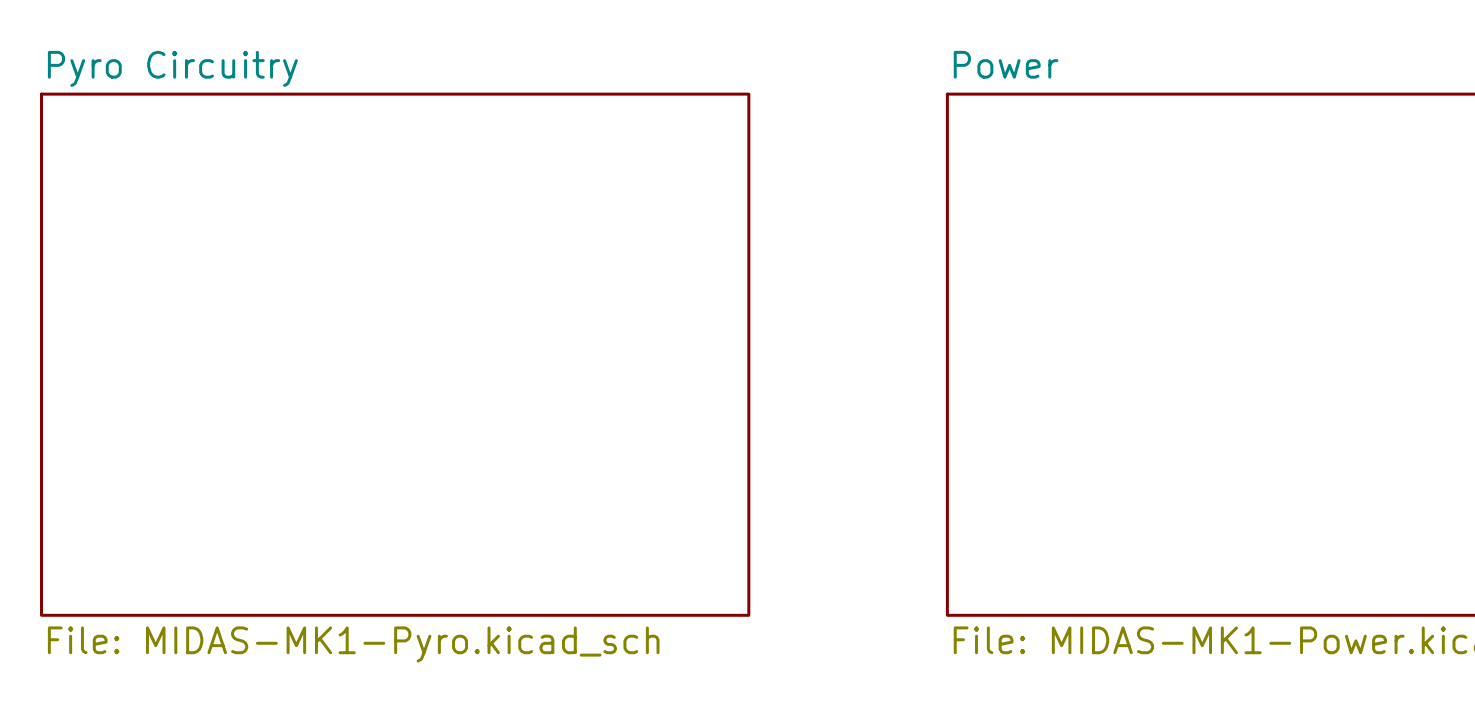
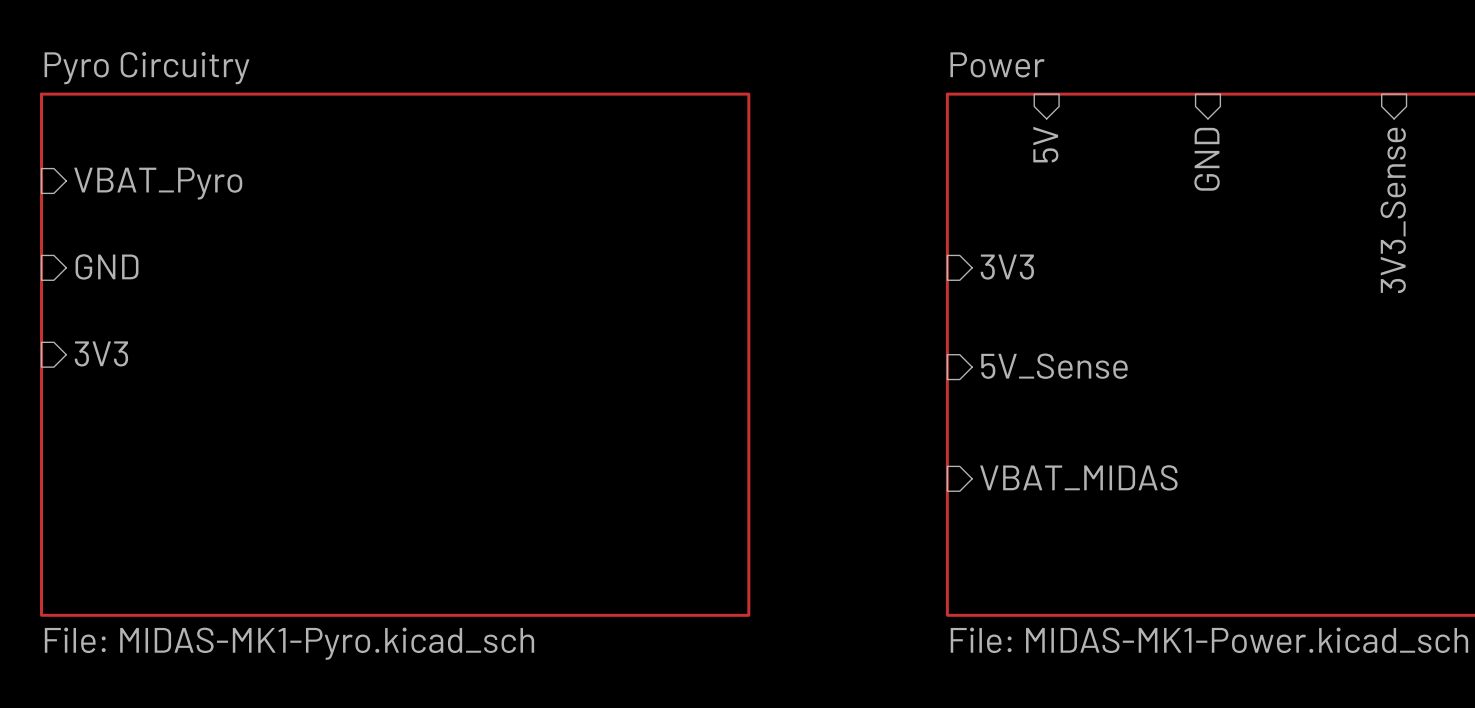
sheet pin: none -> 5V (1045, 144)
sheet pin: none -> GND (1207, 159)
sheet pin: none -> VBAT_Pyro (158, 183)
sheet pin: none -> 3V3_Sense (1393, 210)
sheet pin: none -> GND (107, 266)
sheet pin: none -> 3V3 (1007, 267)
sheet pin: none -> 3V3 (101, 353)
sheet pin: none -> 5V_Sense (1054, 366)
sheet pin: none -> VBAT_MIDAS (1078, 477)

